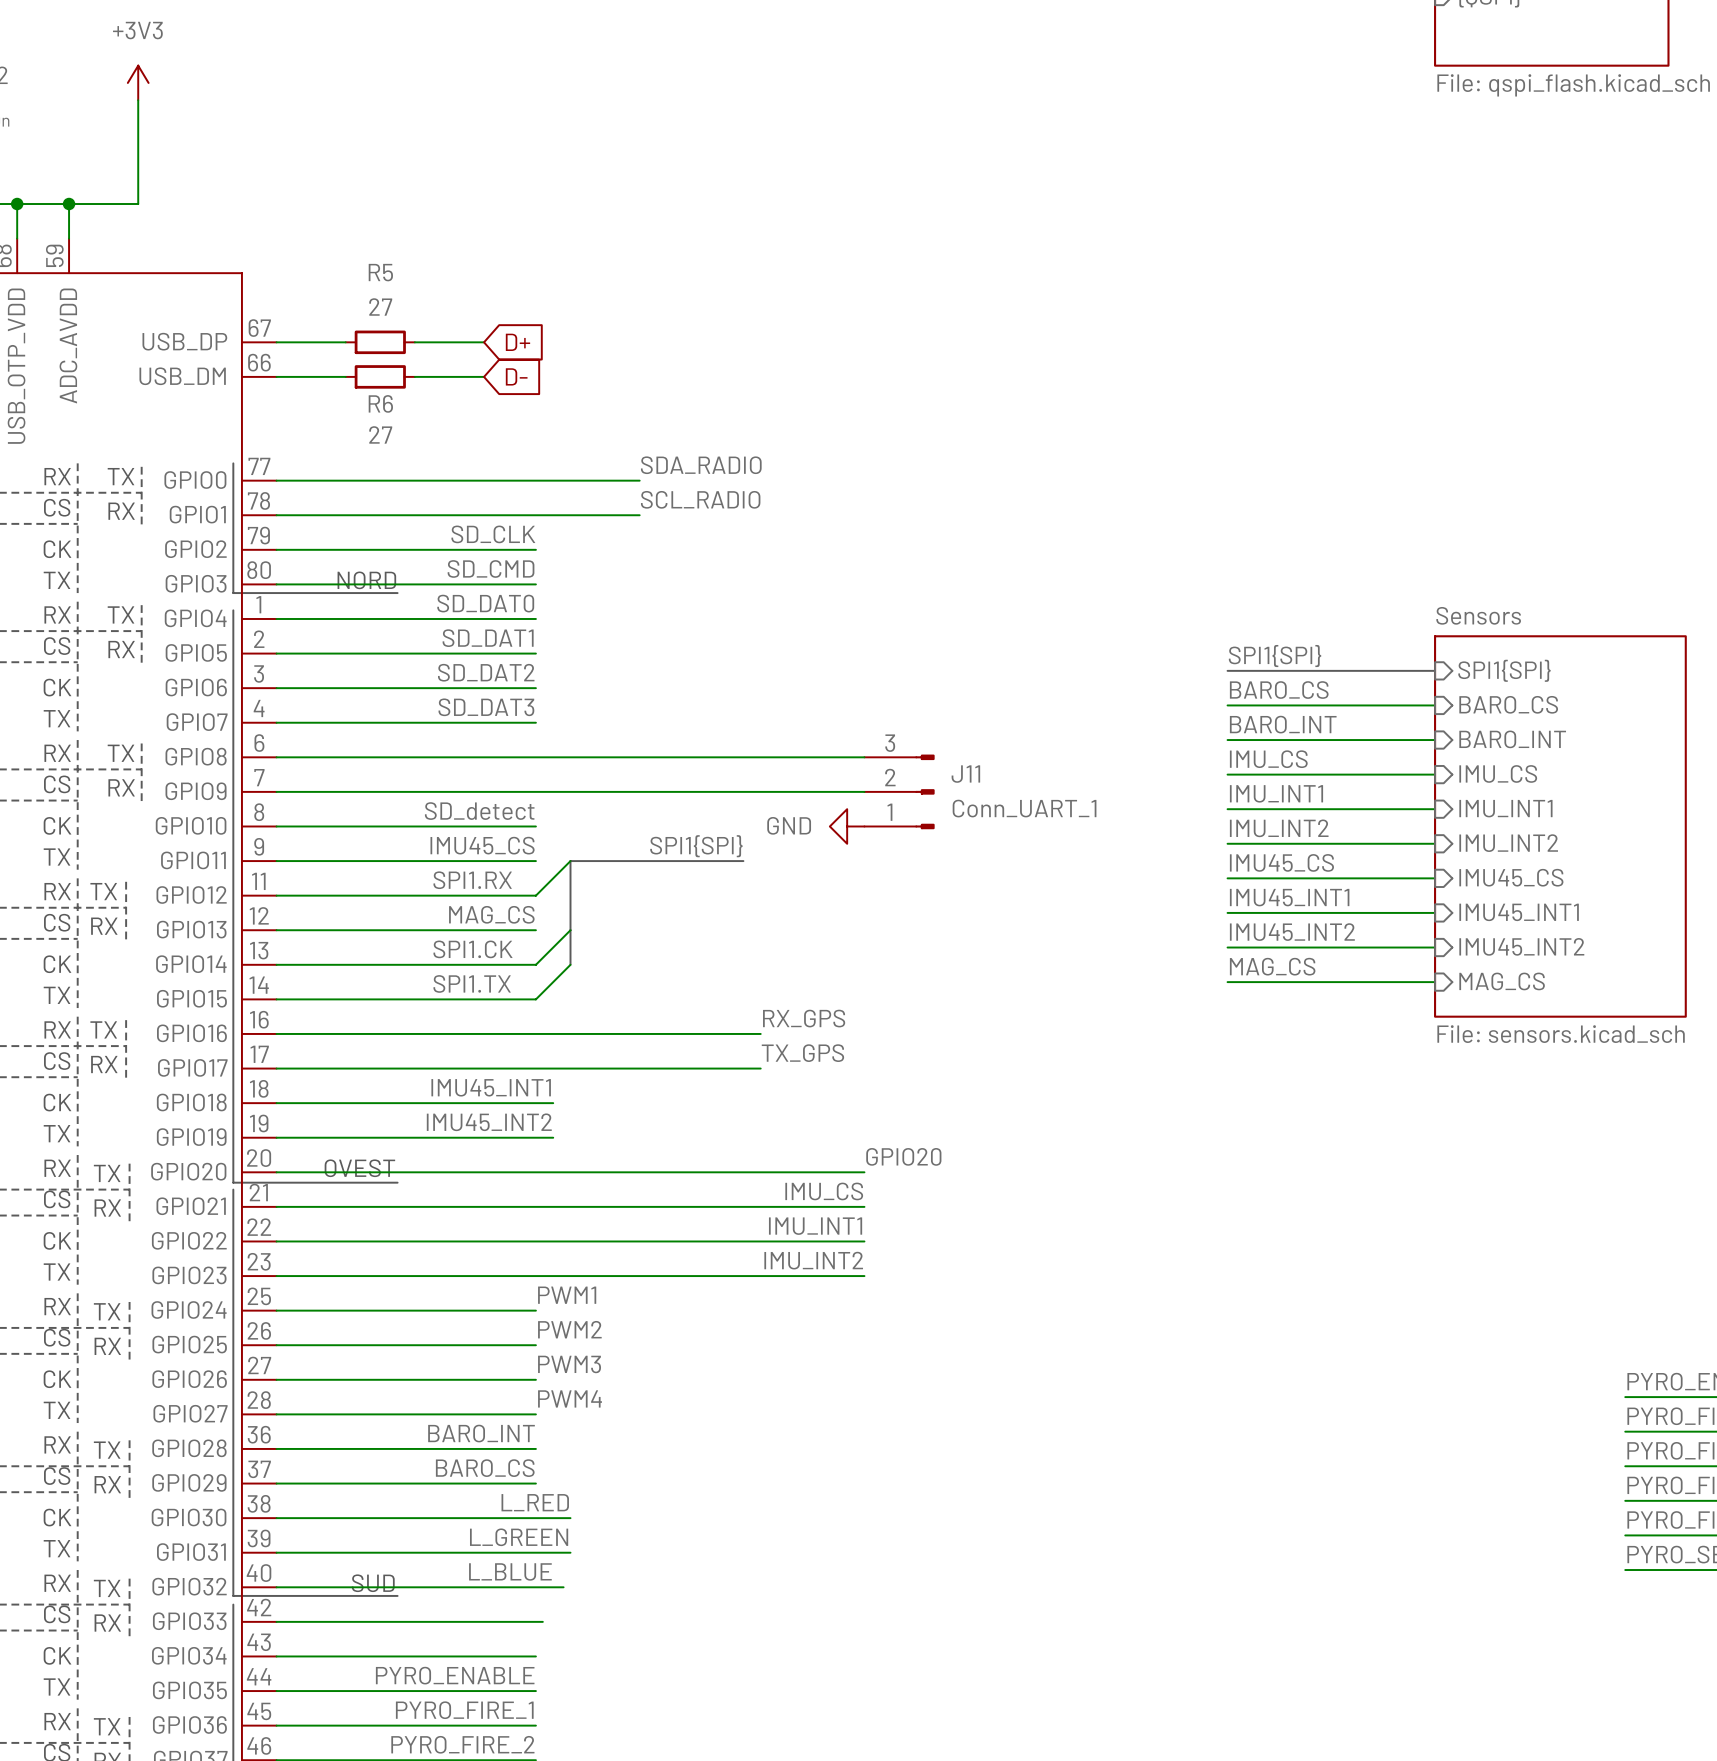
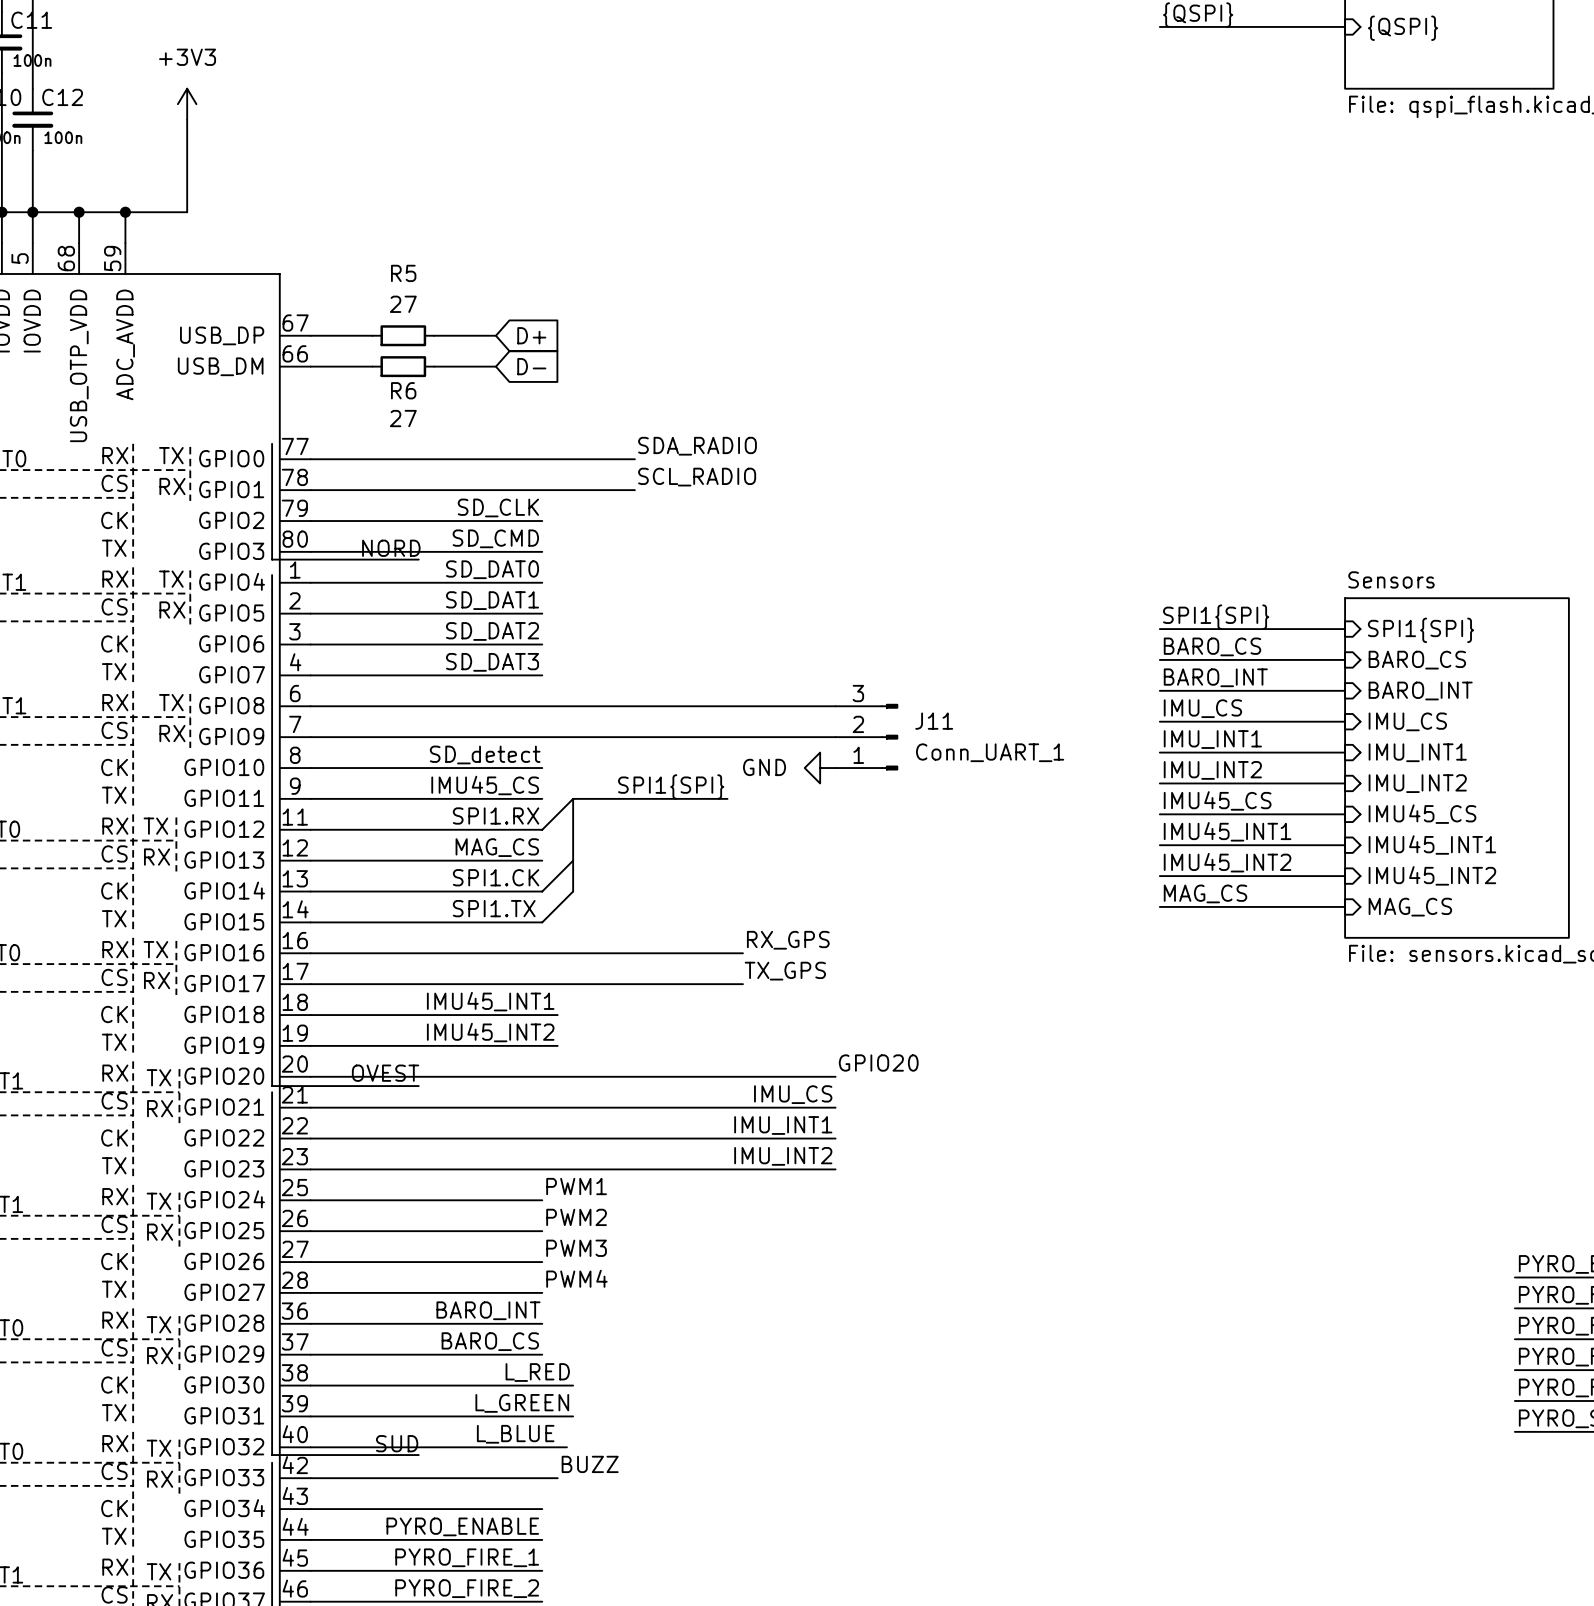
label: none -> BUZZ (590, 1464)
wire: none -> (548, 1478) (557, 1478)

